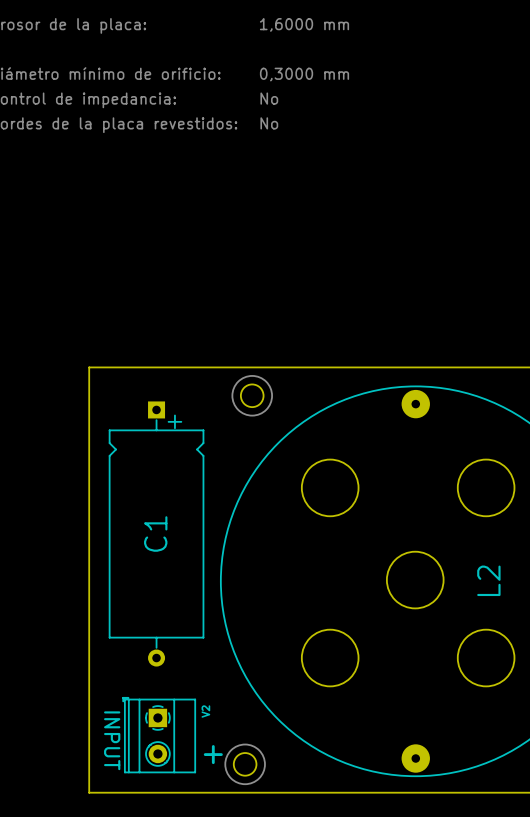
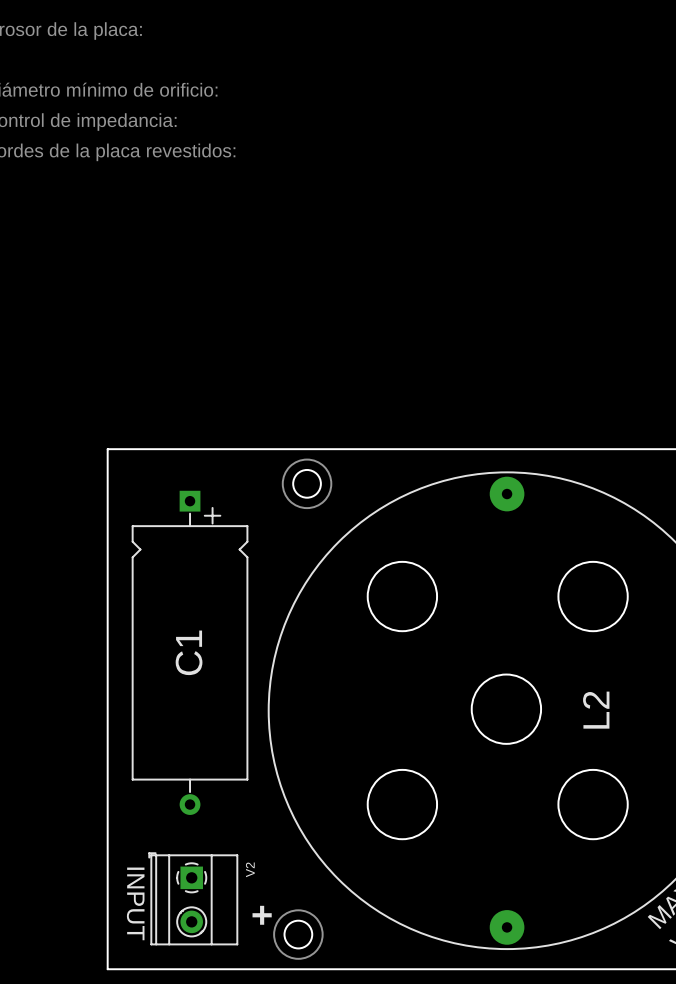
text: 1,6000 mm (304, 24) -> none
text: 0,3000 mm (304, 74) -> none
text: No (269, 98) -> none
text: No (269, 123) -> none

